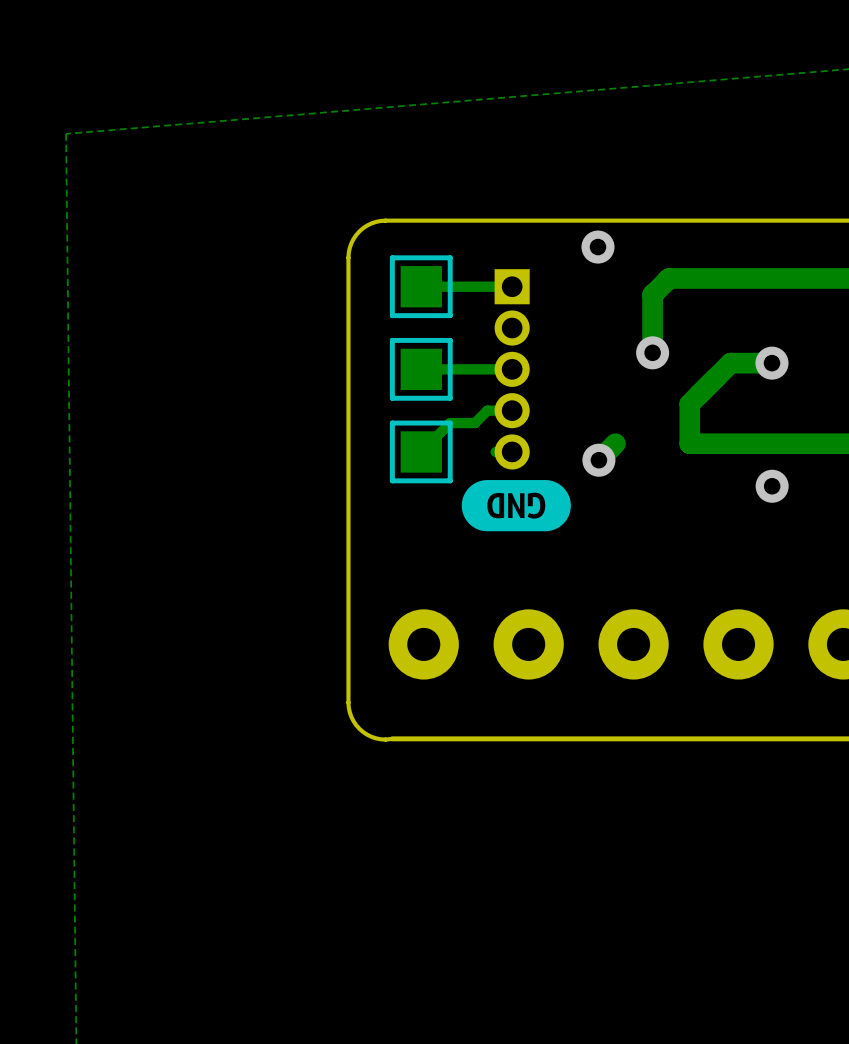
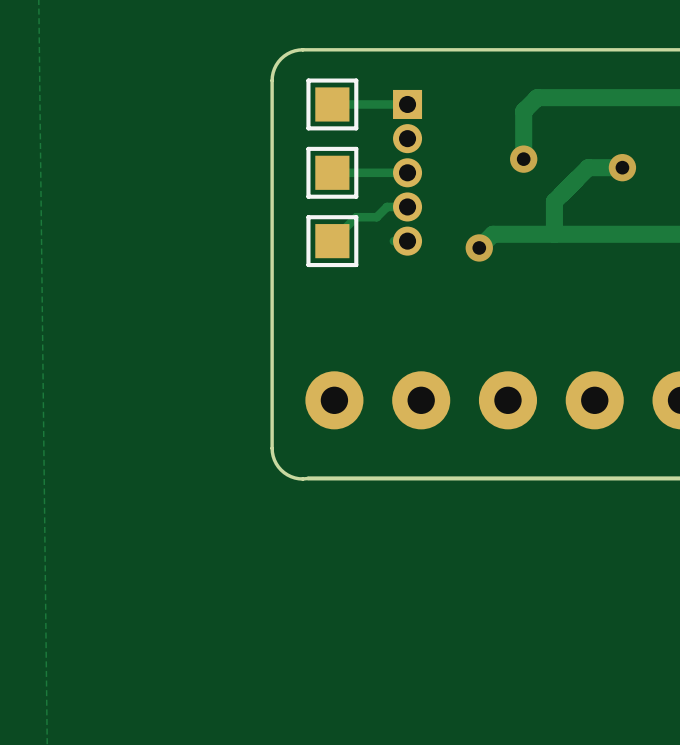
via: (597, 247) -> none
track: none -> (554, 234) (492, 234)
drawing: [461, 480, 571, 532] -> none
via: (772, 486) -> none

